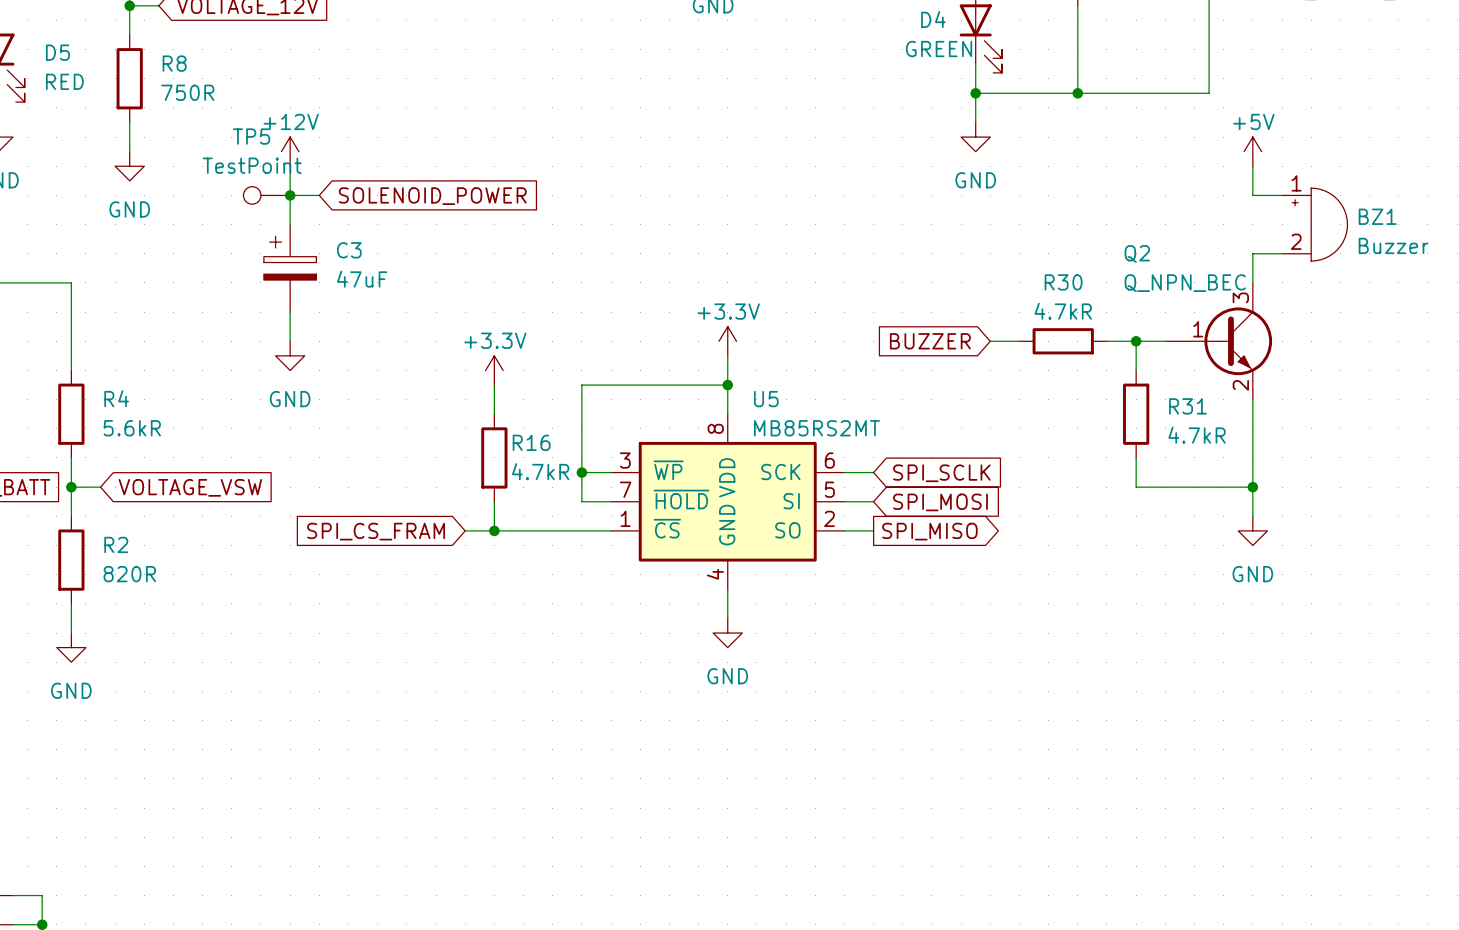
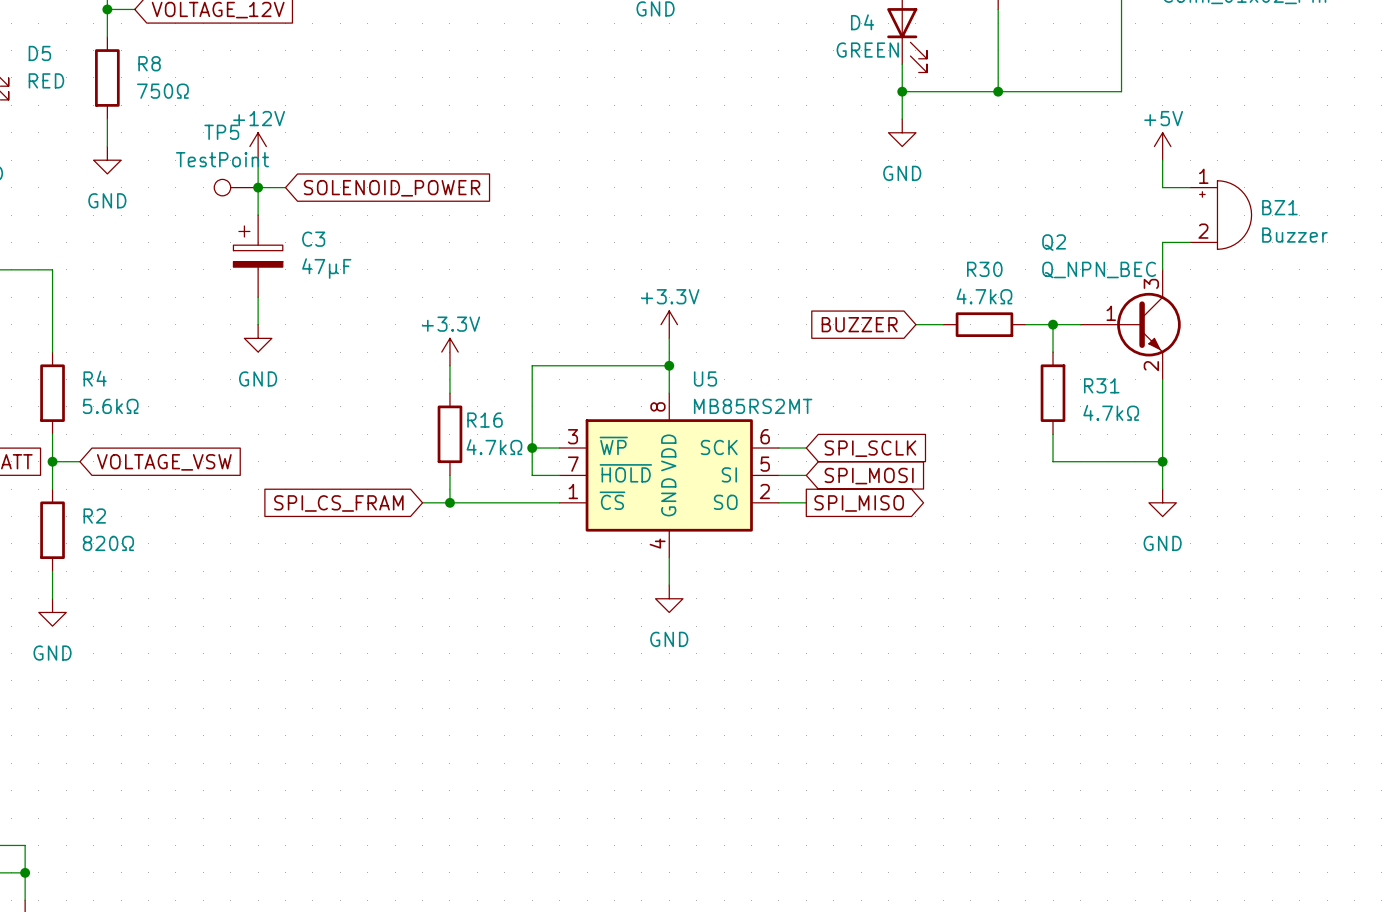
R8 value: 750R (187, 92) -> 750Ω (162, 91)
C3 value: 47uF (362, 279) -> 47μF (326, 268)
R30 value: 4.7kR (1063, 311) -> 4.7kΩ (984, 296)
R4 value: 5.6kR (132, 428) -> 5.6kΩ (110, 406)
R31 value: 4.7kR (1197, 435) -> 4.7kΩ (1111, 412)
R16 value: 4.7kR (540, 471) -> 4.7kΩ (494, 447)
R2 value: 820R (129, 574) -> 820Ω (108, 543)

